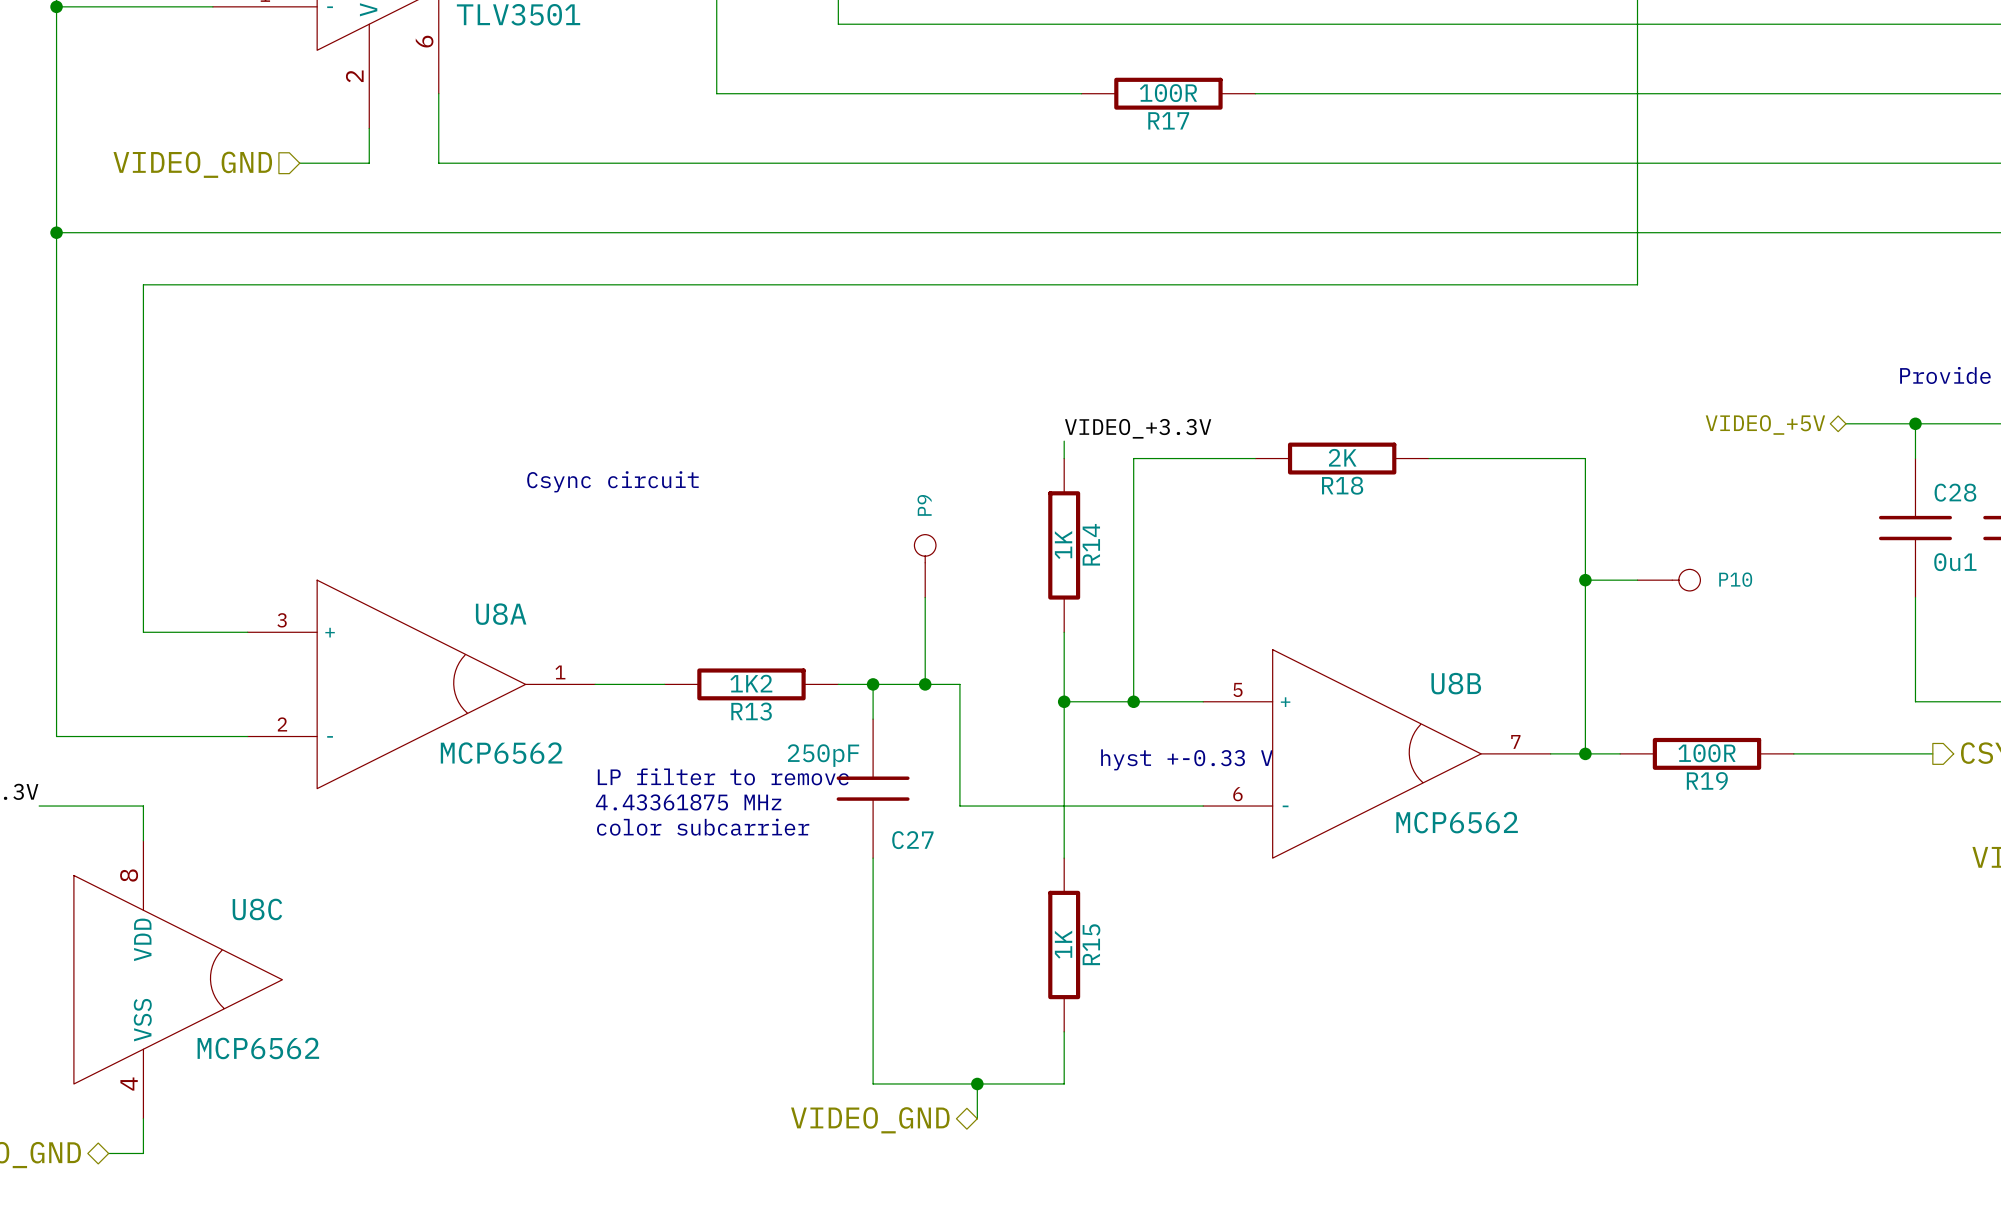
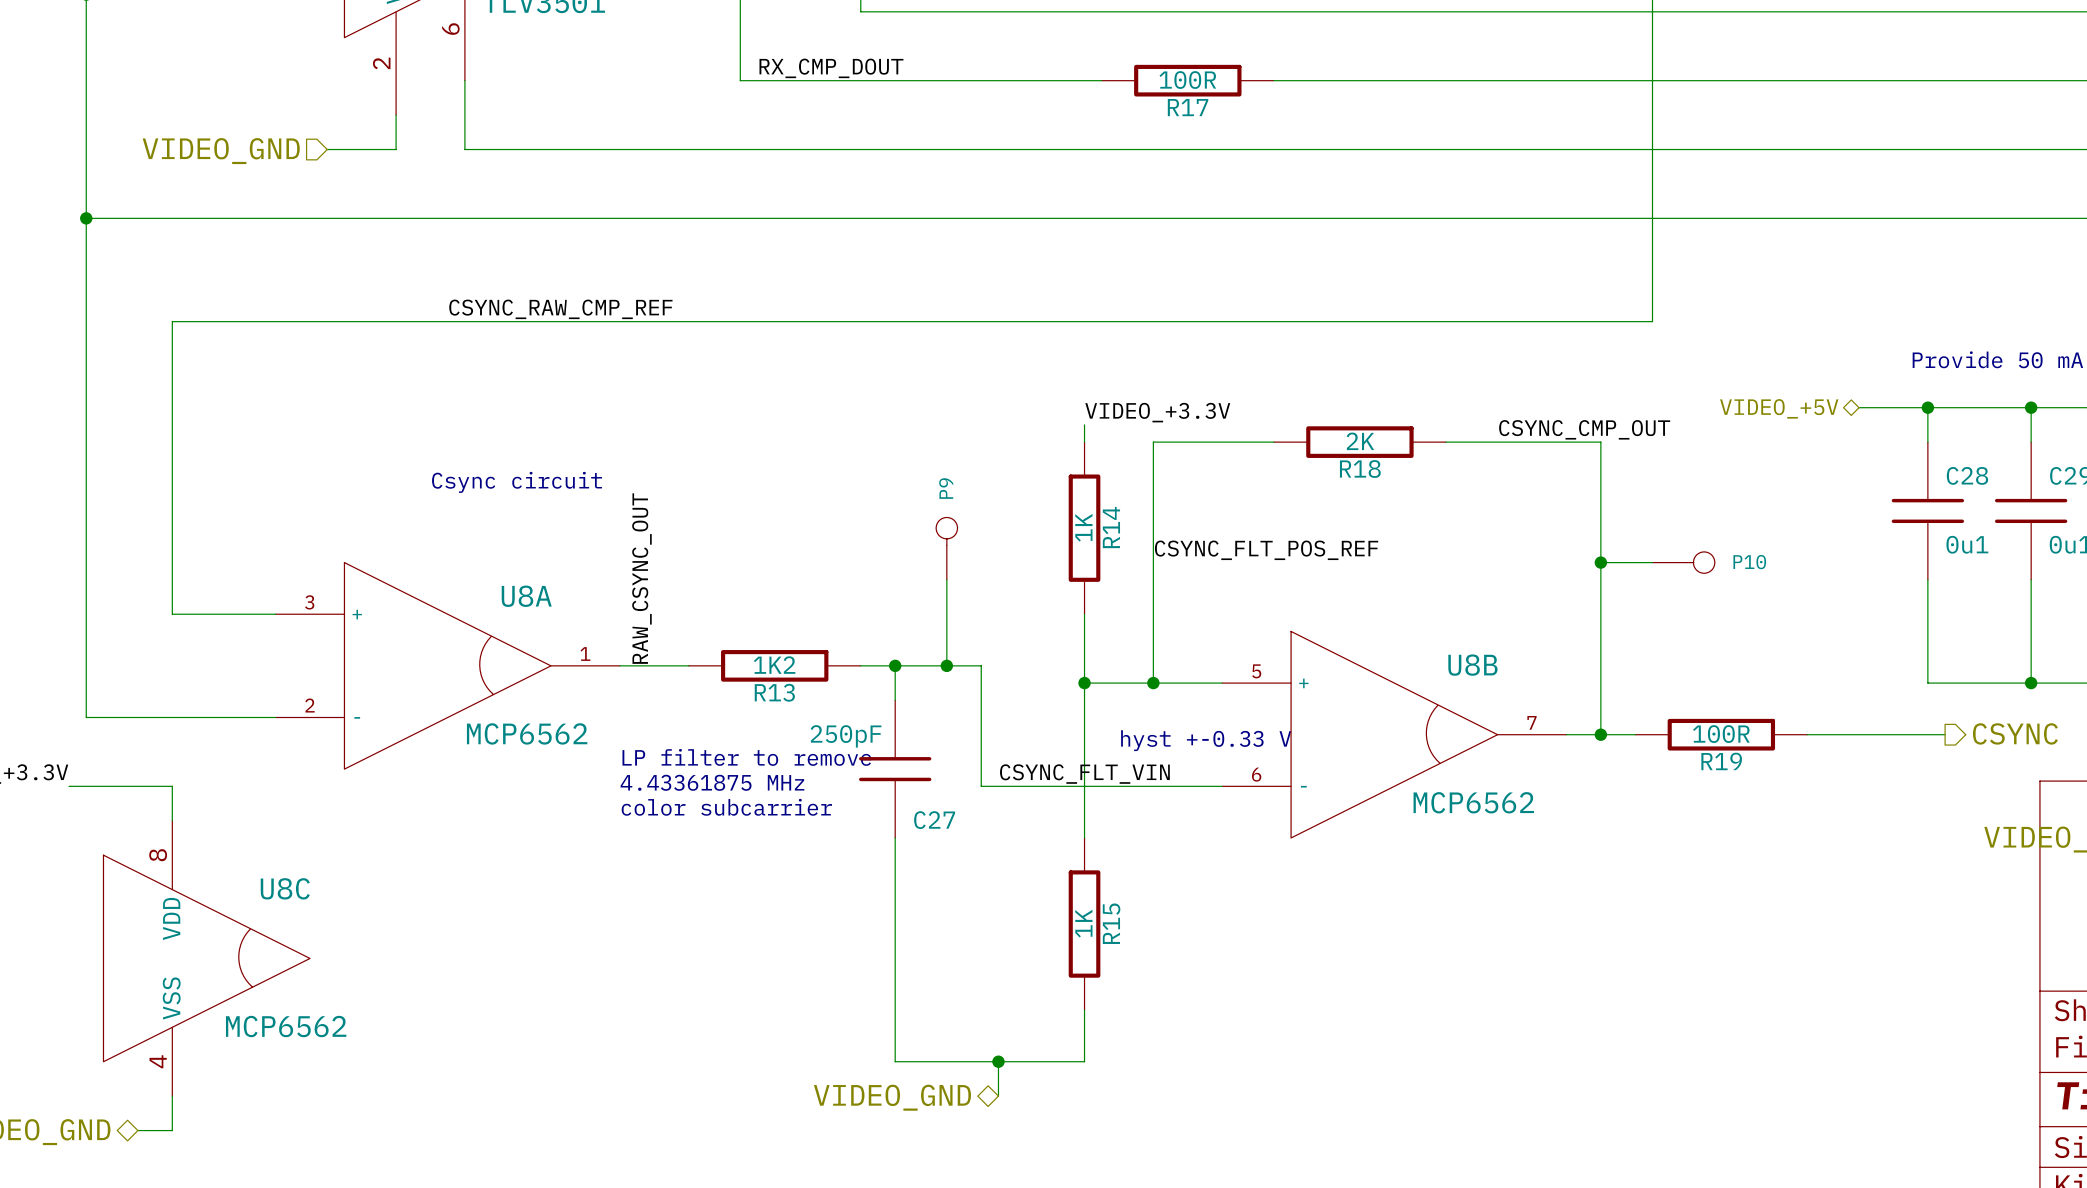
label: none -> RX_CMP_DOUT (831, 68)
wire: (1637, 284) (143, 284) (143, 336) -> (1652, 270) (1652, 321) (172, 321)
label: none -> CSYNC_RAW_CMP_REF (560, 309)
label: none -> CSYNC_CMP_OUT (1584, 429)
text position: Csync circuit (612, 481) -> Csync circuit (517, 482)
label: none -> CSYNC_FLT_POS_REF (1266, 550)
label: none -> RAW_CSYNC_OUT (641, 578)
label: none -> CSYNC_FLT_VIN (1084, 774)

